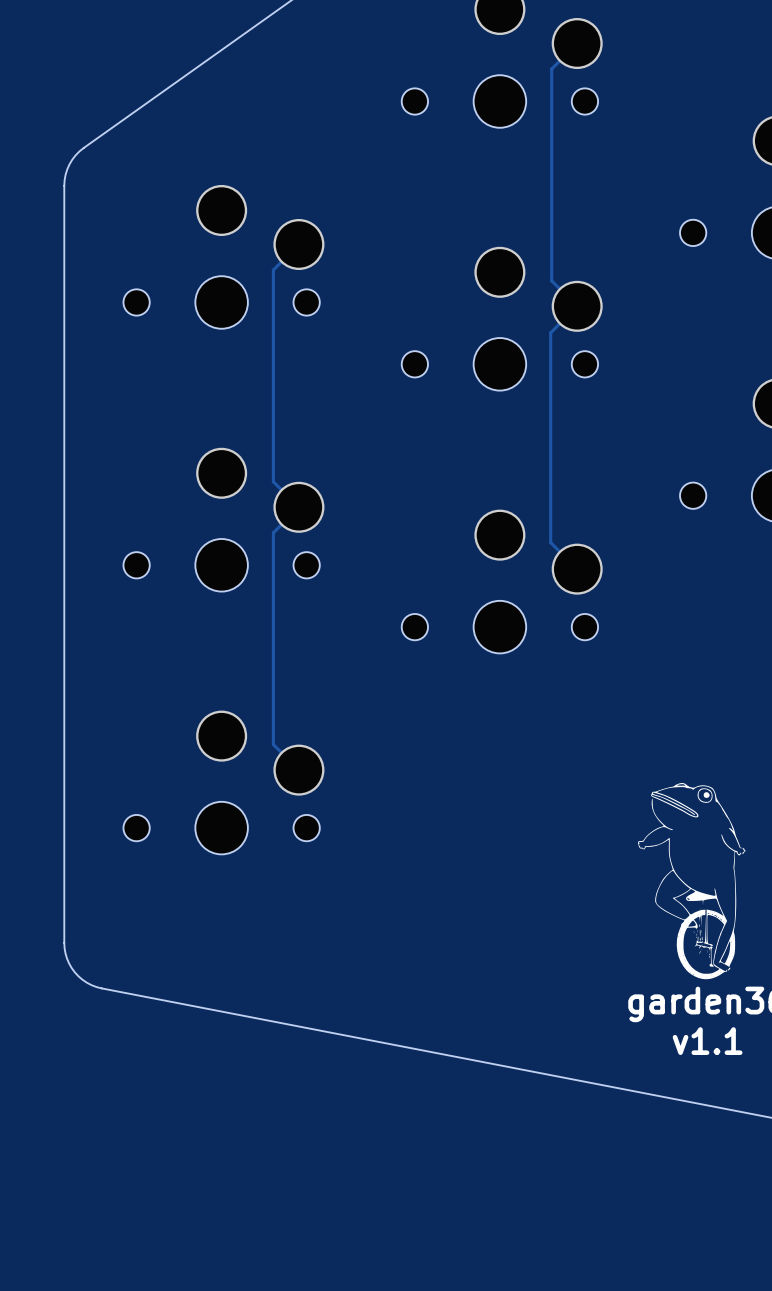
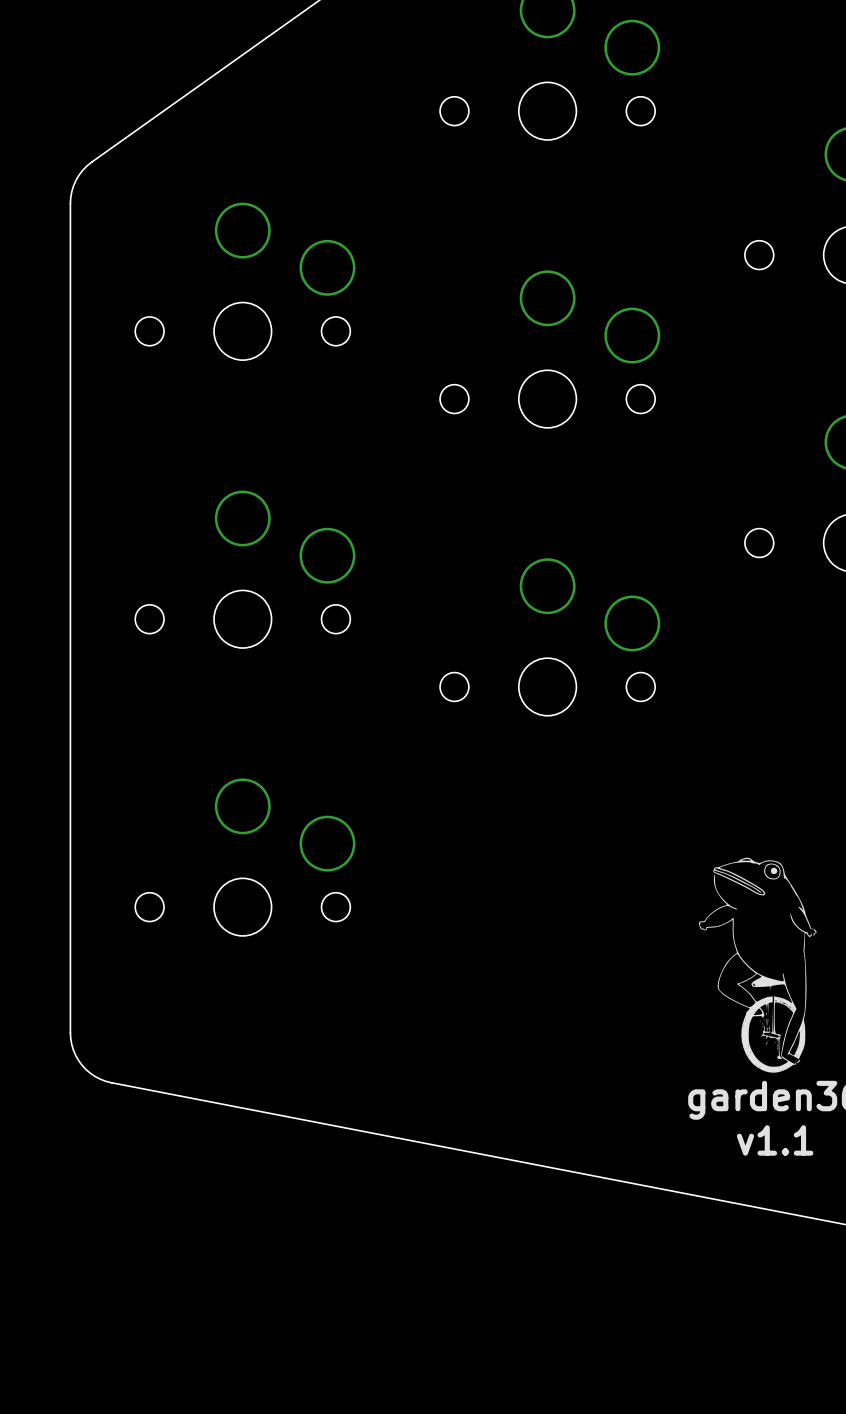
track: (577, 43) (551, 69) (551, 280) (577, 306) (550, 332) (550, 542) (577, 569) -> none
track: (298, 244) (273, 270) (273, 481) (298, 507) (273, 532) (273, 744) (298, 770) -> none

